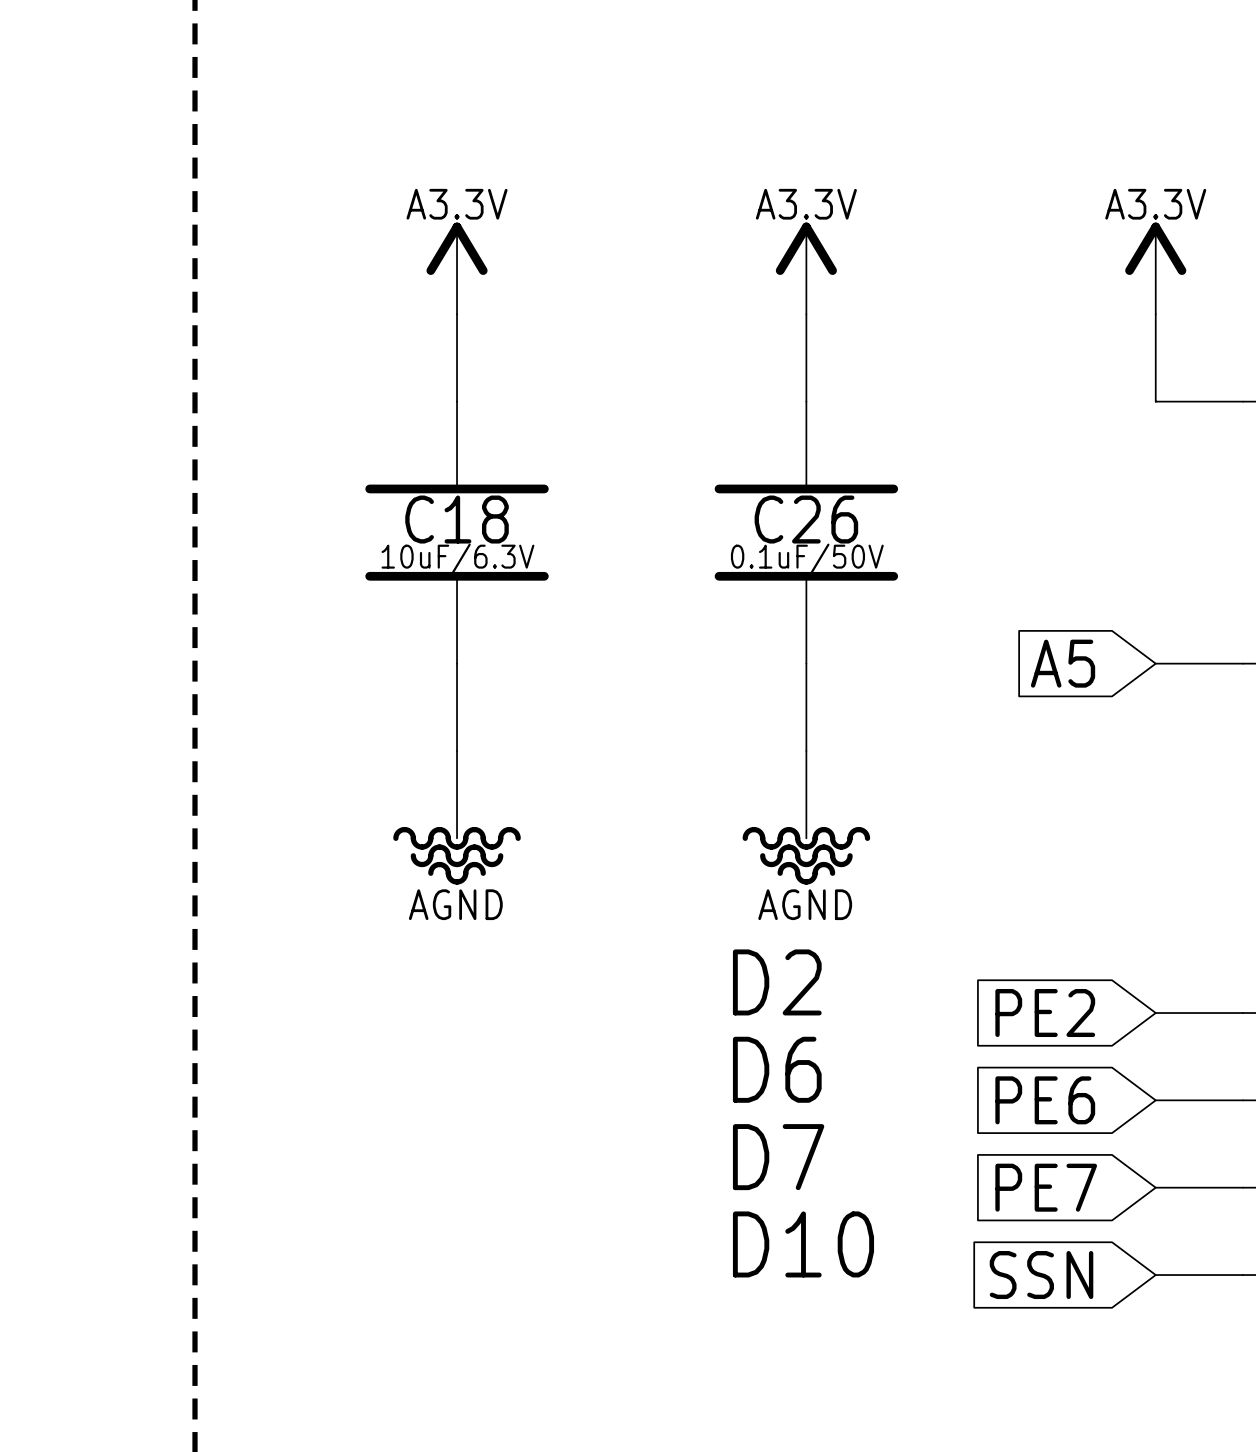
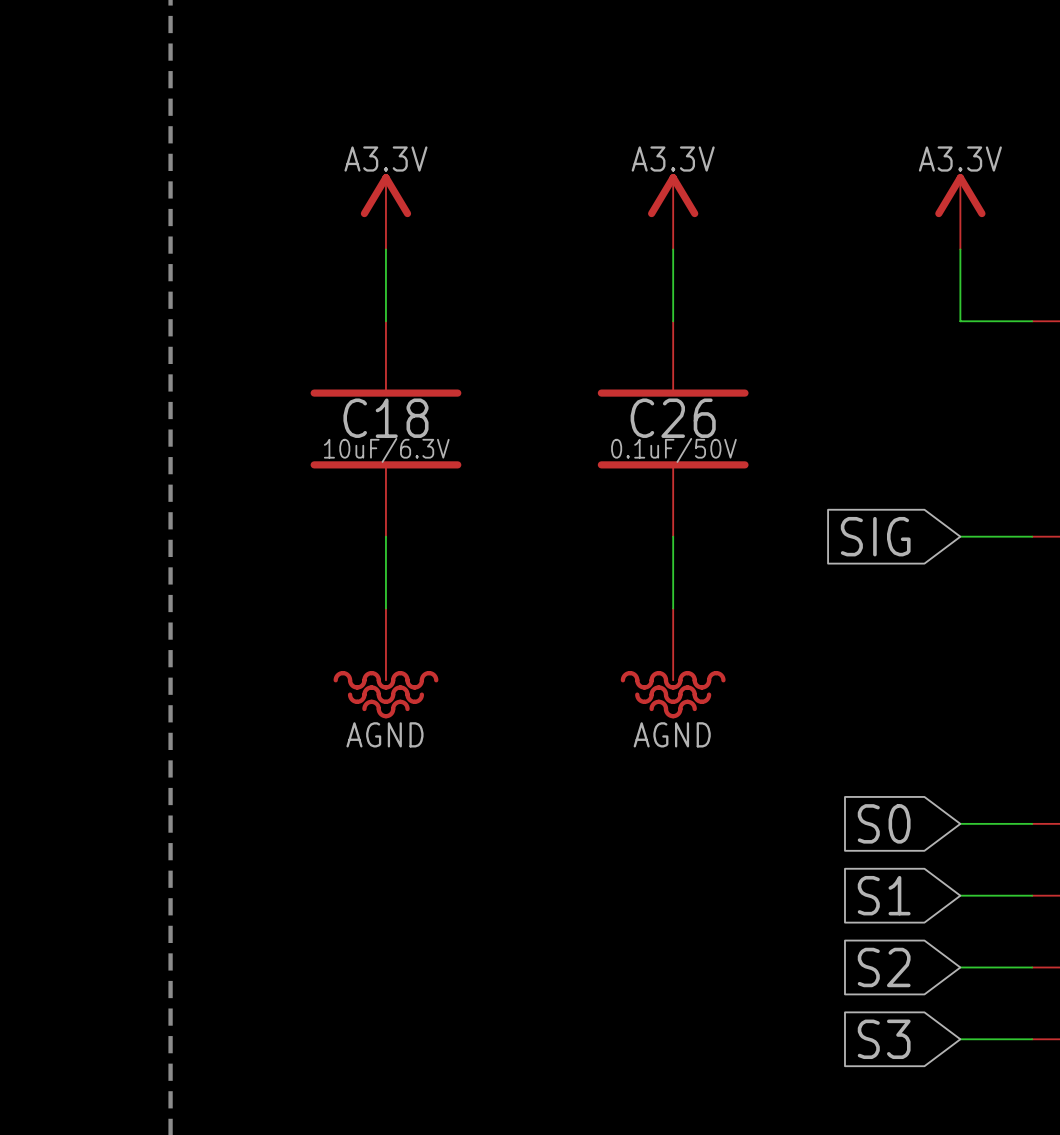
global label: A5 (1063, 663) -> SIG (875, 536)
text: D2 (777, 982) -> none
global label: PE2 (1045, 1013) -> S0 (884, 823)
text: D6 (777, 1069) -> none
global label: PE6 (1045, 1100) -> S1 (884, 895)
text: D7 (778, 1157) -> none
global label: PE7 (1046, 1187) -> S2 (884, 967)
text: D10 (803, 1244) -> none
global label: SSN (1041, 1275) -> S3 (884, 1039)

